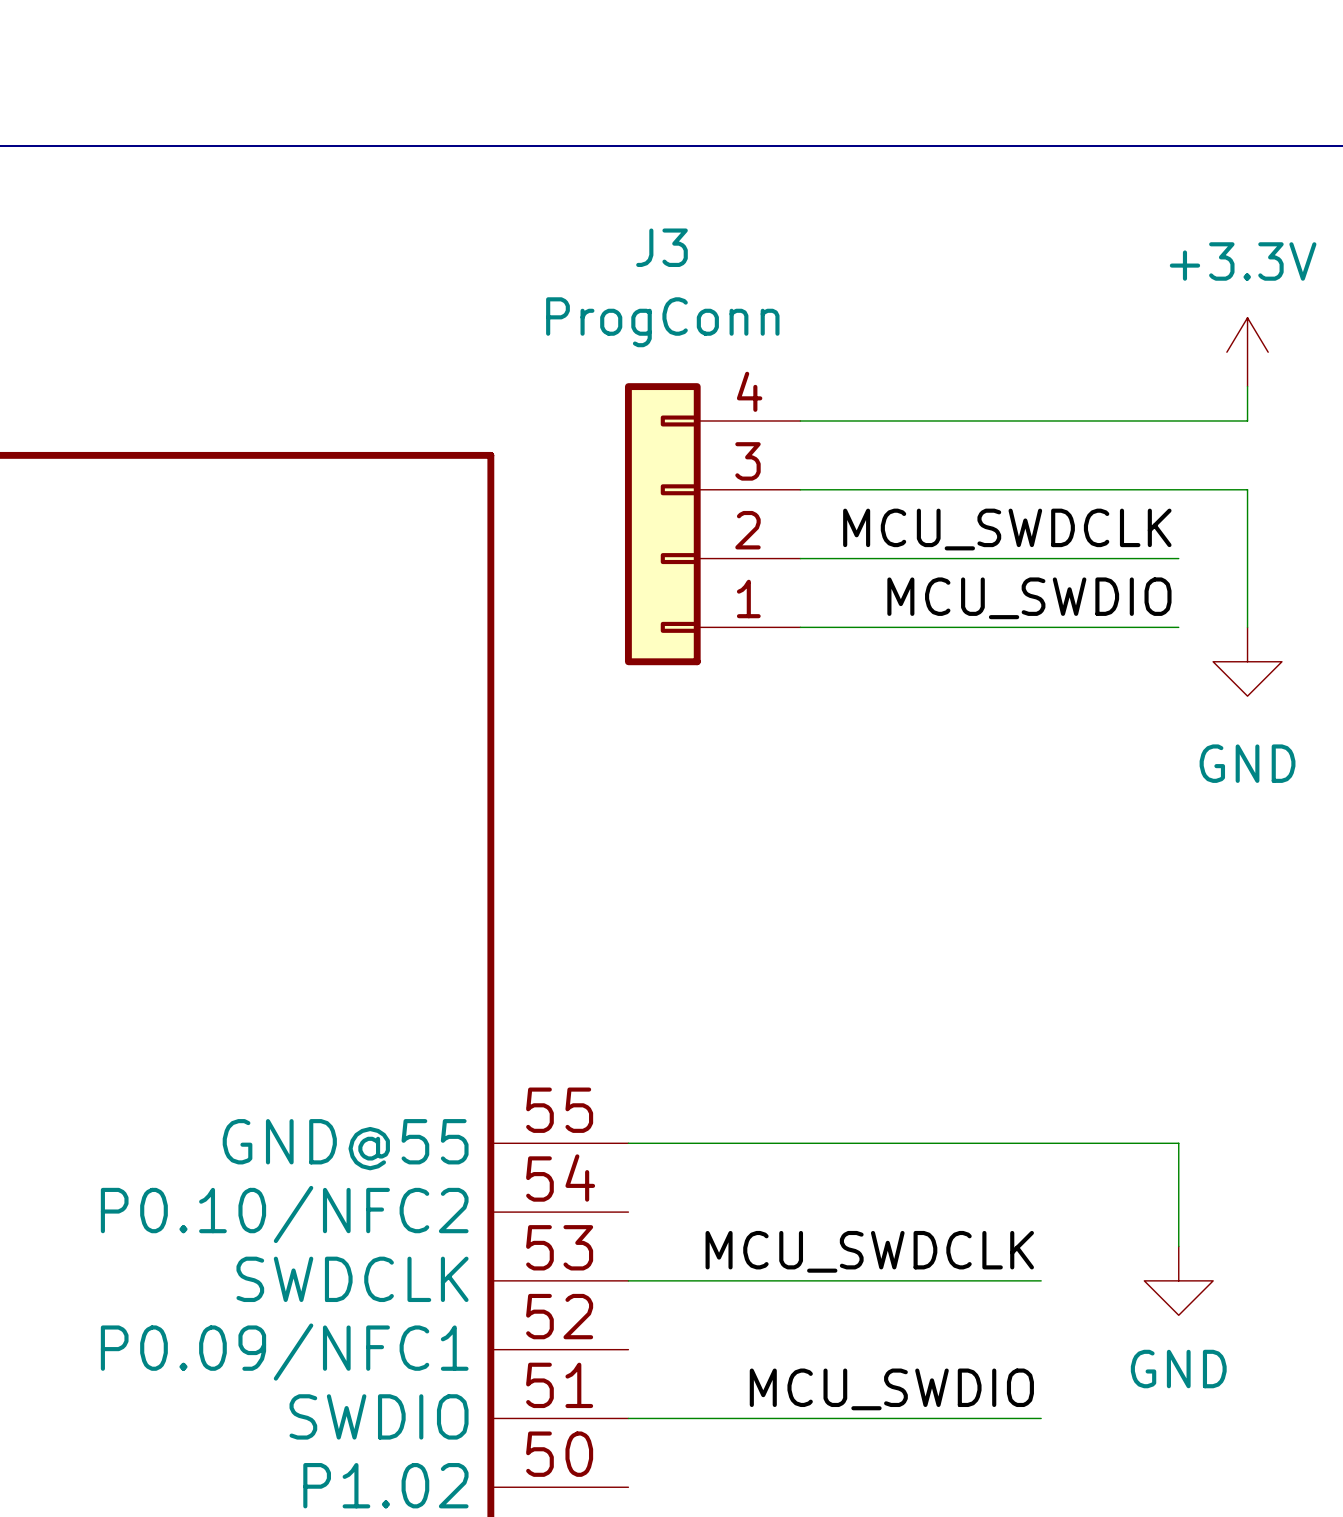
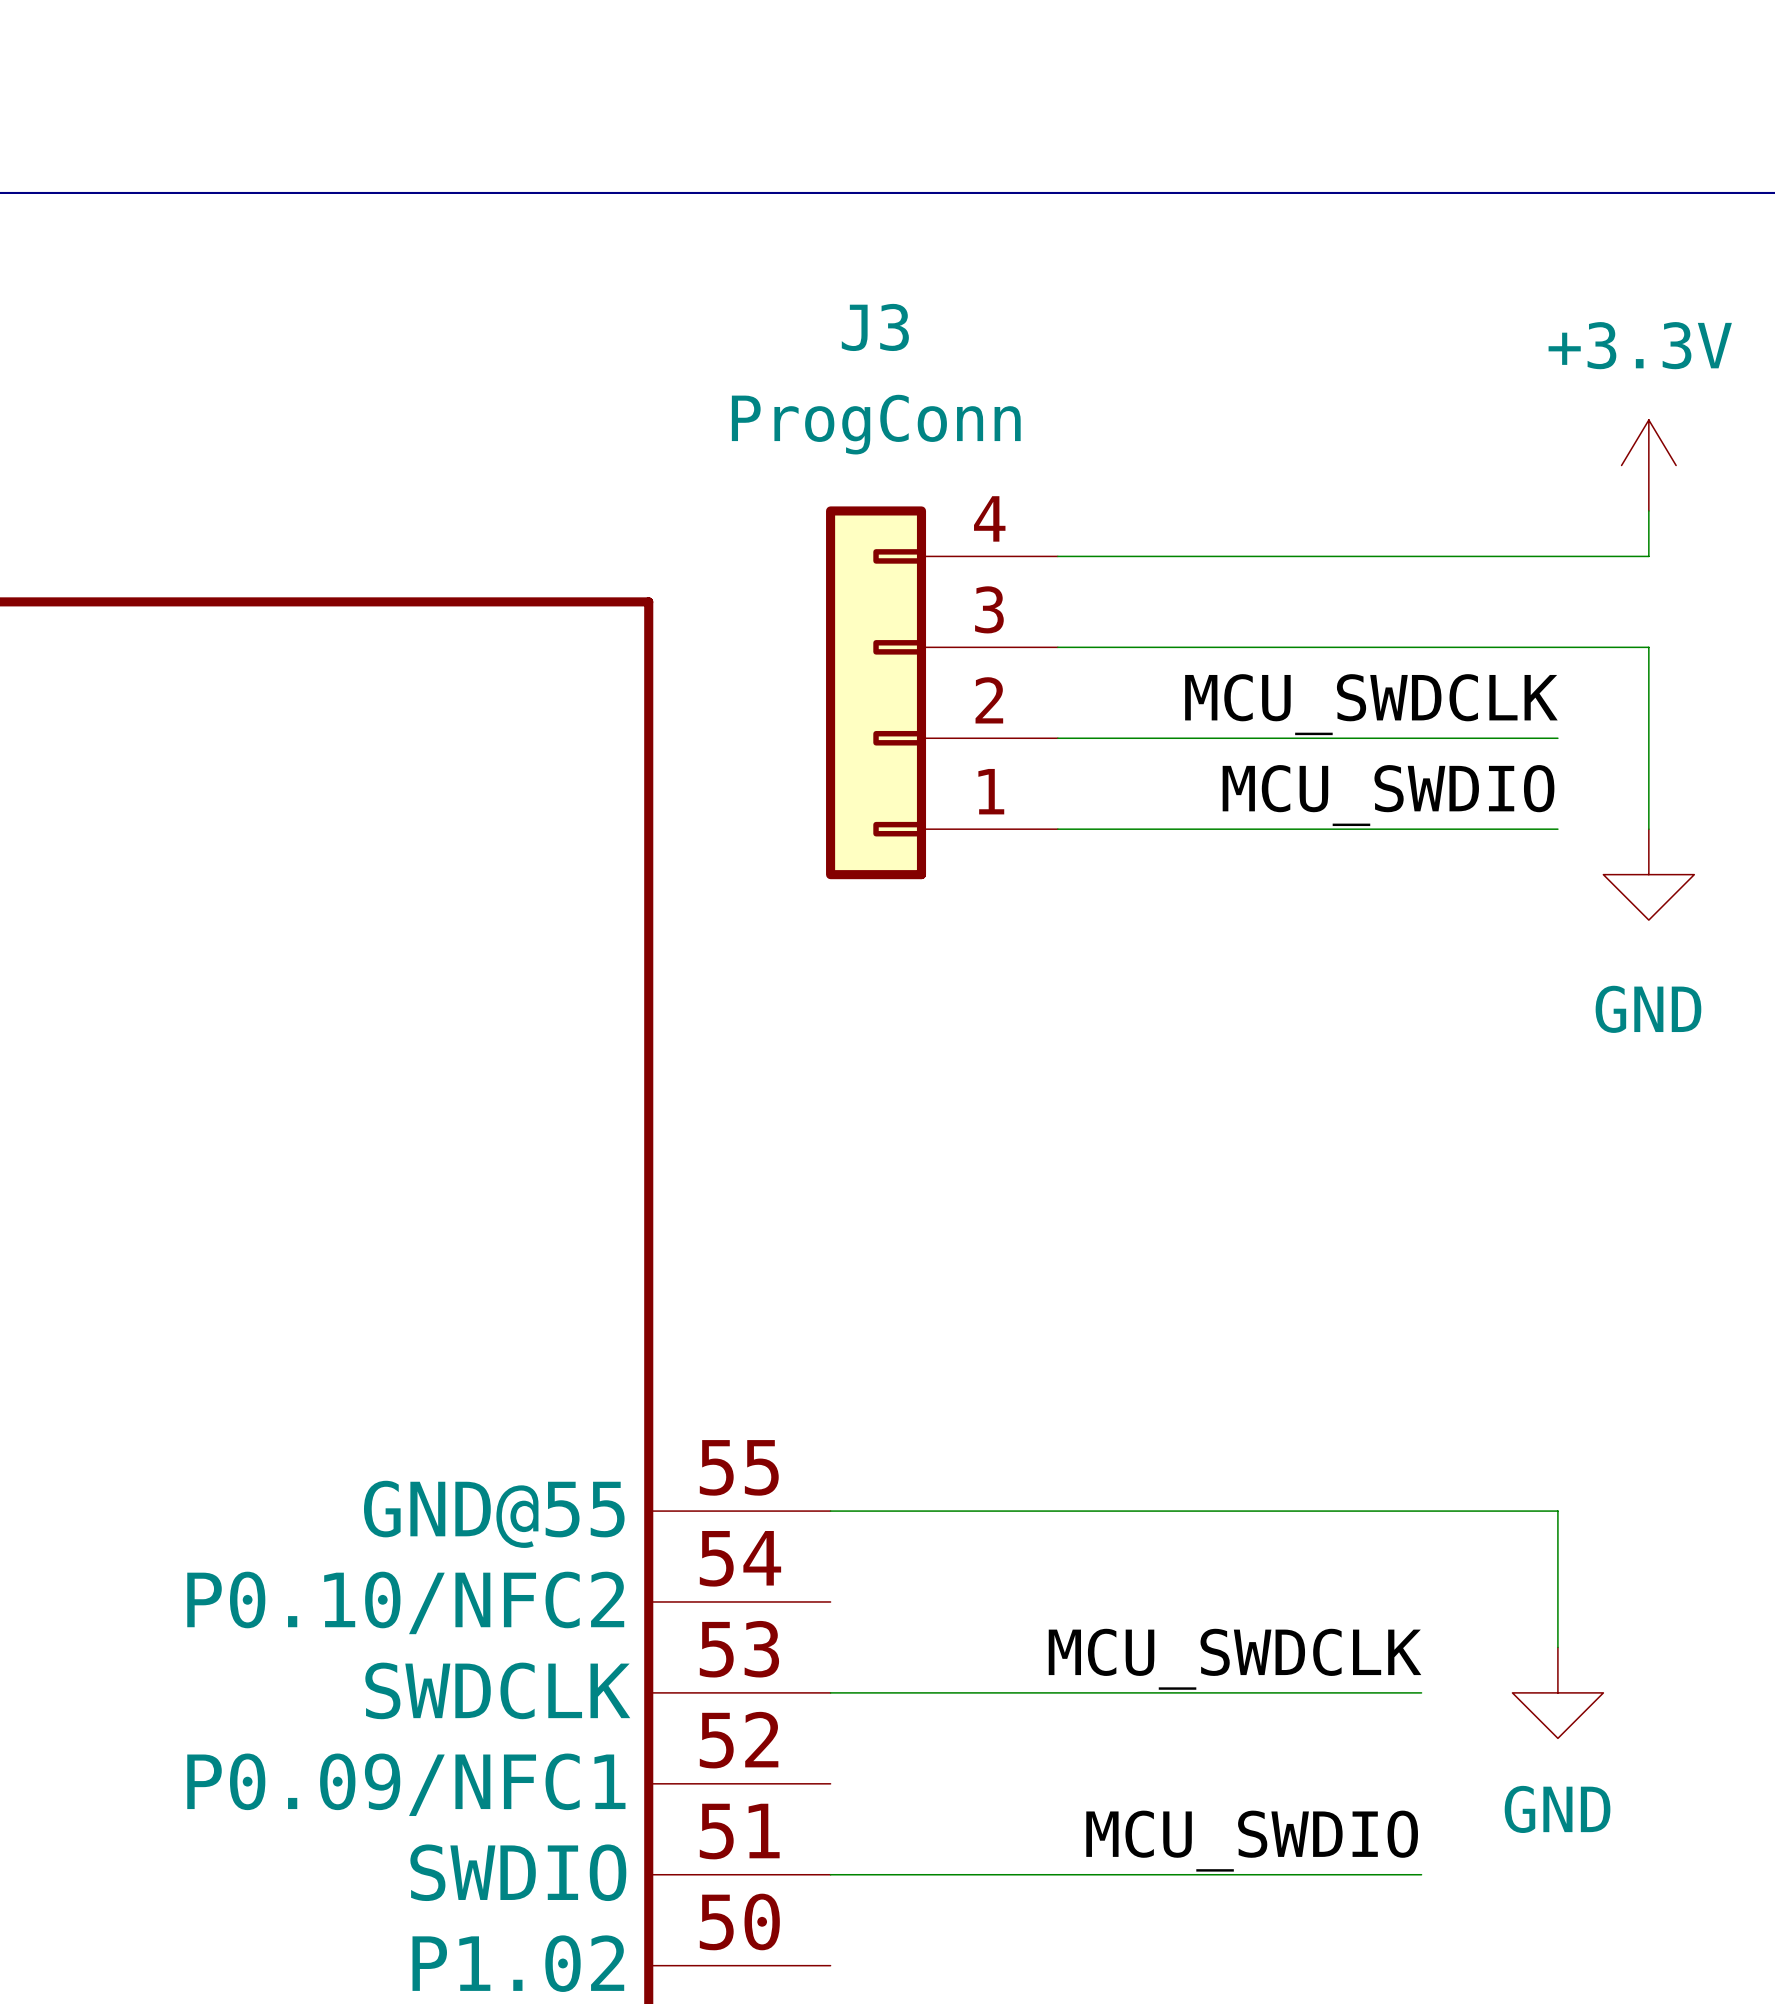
label position: MCU_SWDCLK (869, 1251) -> MCU_SWDCLK (1235, 1659)
wire: none -> (1376, 1692) (1421, 1692)
label position: MCU_SWDIO (891, 1389) -> MCU_SWDIO (1252, 1841)
wire: none -> (1376, 1874) (1421, 1874)

